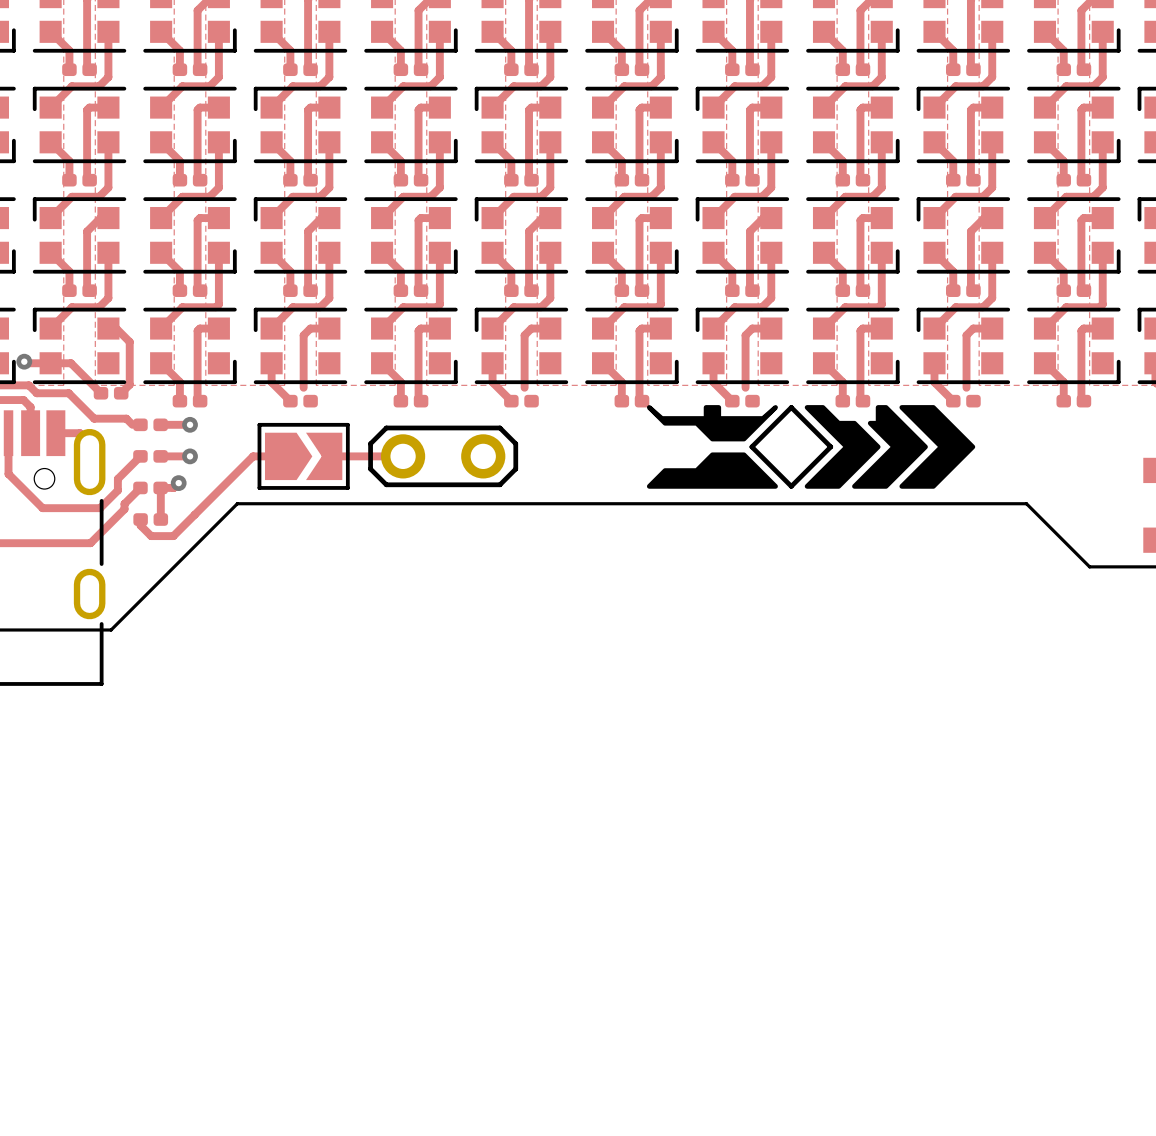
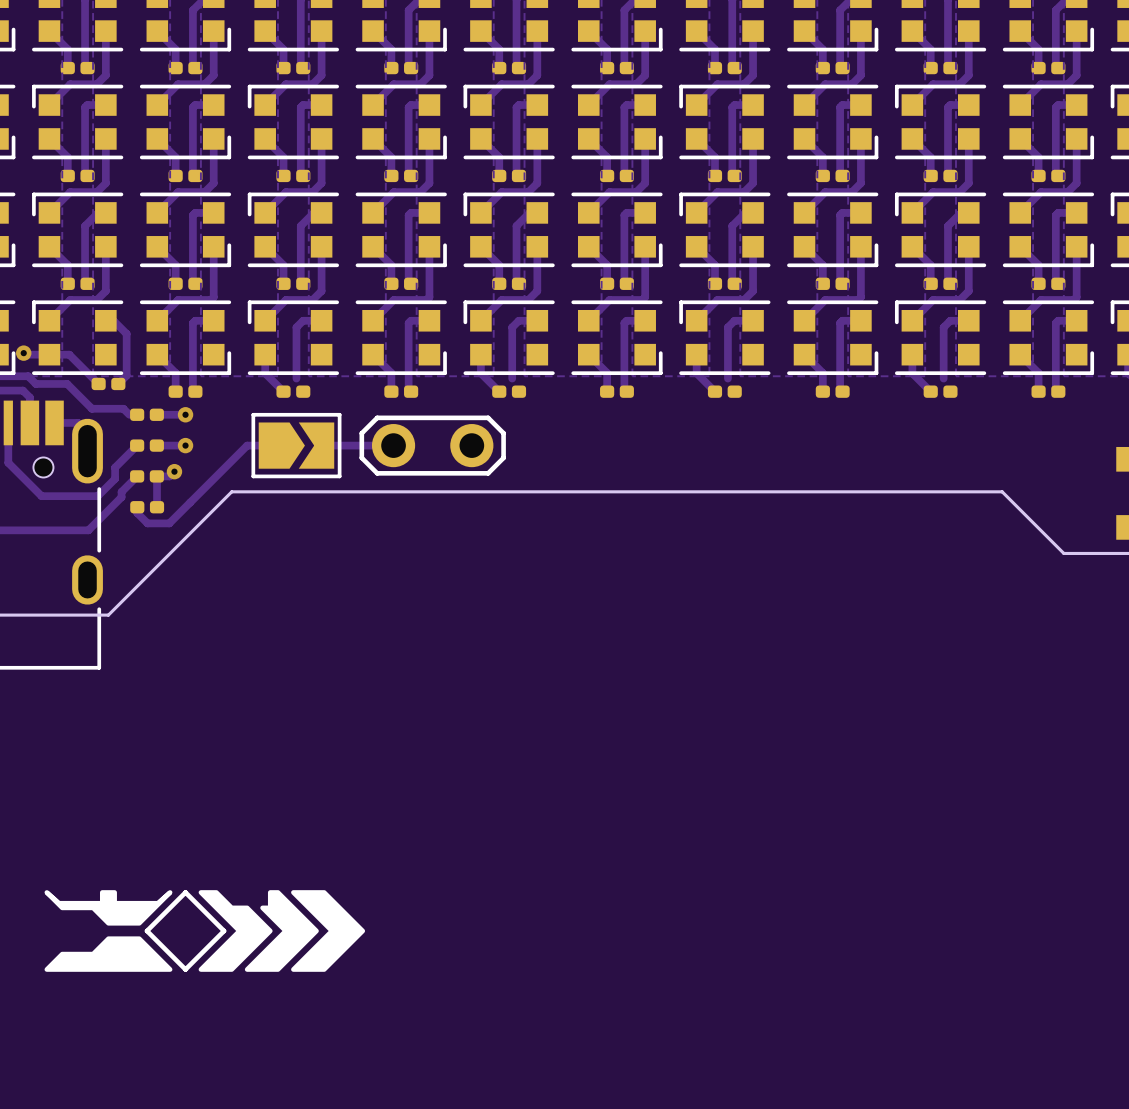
line: (791, 407) (751, 446) (791, 486) (830, 446) (791, 407) -> (185, 892) (147, 930) (185, 969) (224, 930) (185, 892)
drawing position: (712, 423) -> (108, 907)
drawing position: (842, 446) -> (235, 930)
drawing position: (889, 446) -> (281, 930)
drawing position: (937, 446) -> (328, 930)
drawing position: (712, 470) -> (108, 954)

